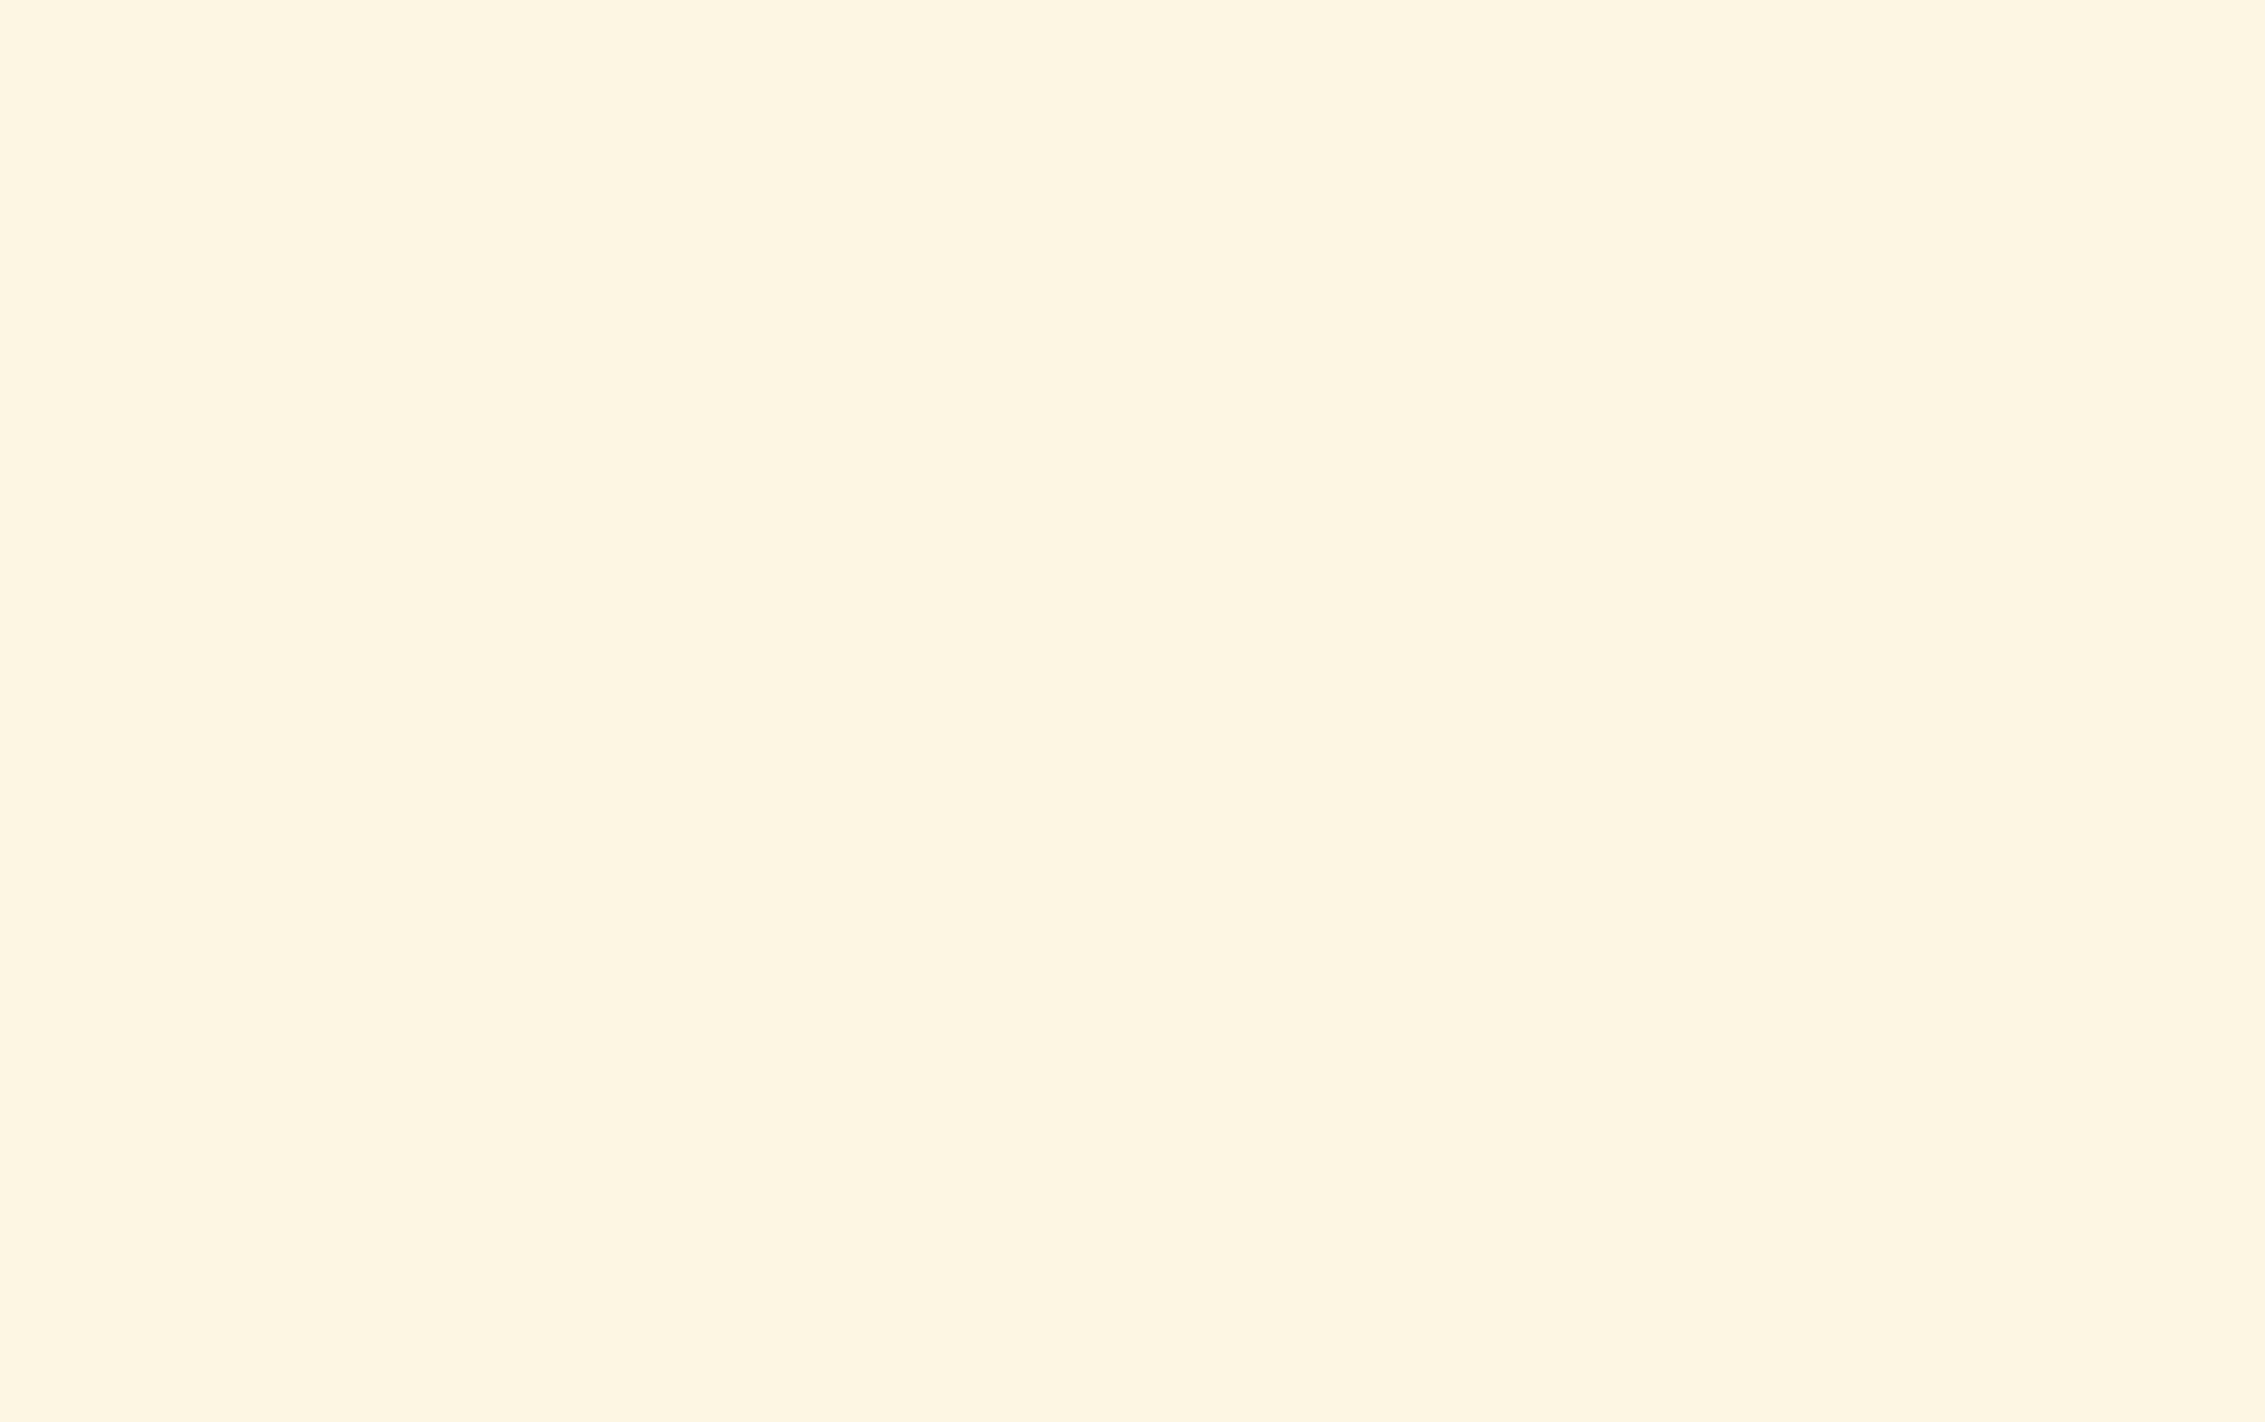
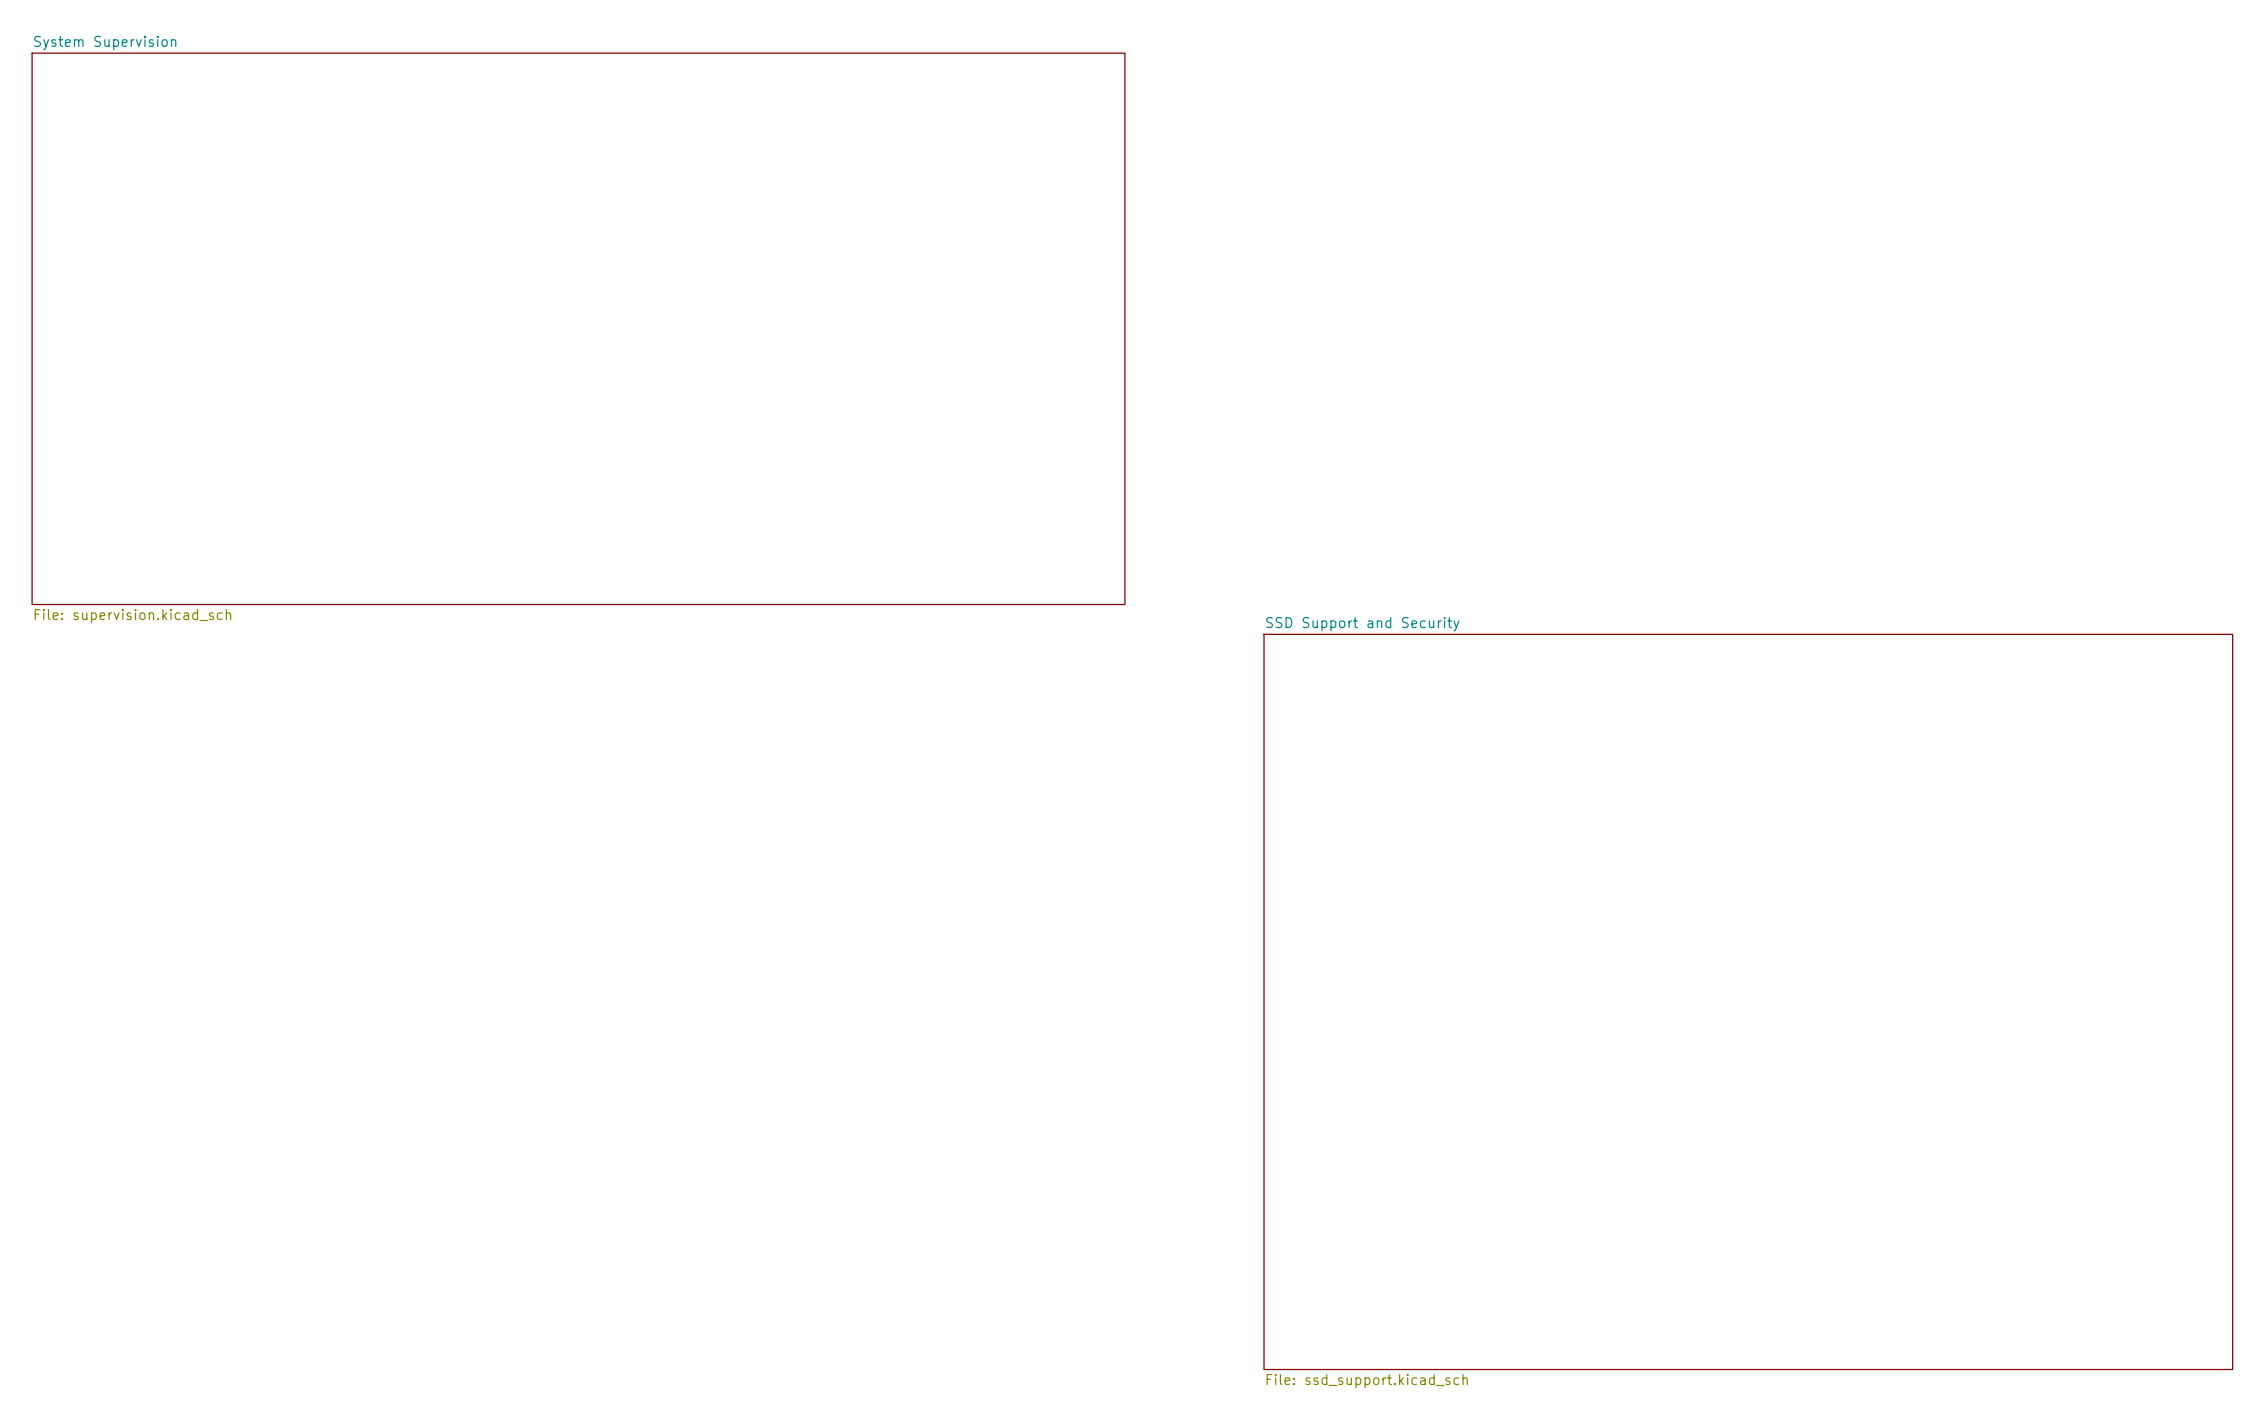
sheet System Supervision: none -> File: supervision.kicad_sch (578, 328)
sheet SSD Support and Security: none -> File: ssd_support.kicad_sch (1748, 1001)

